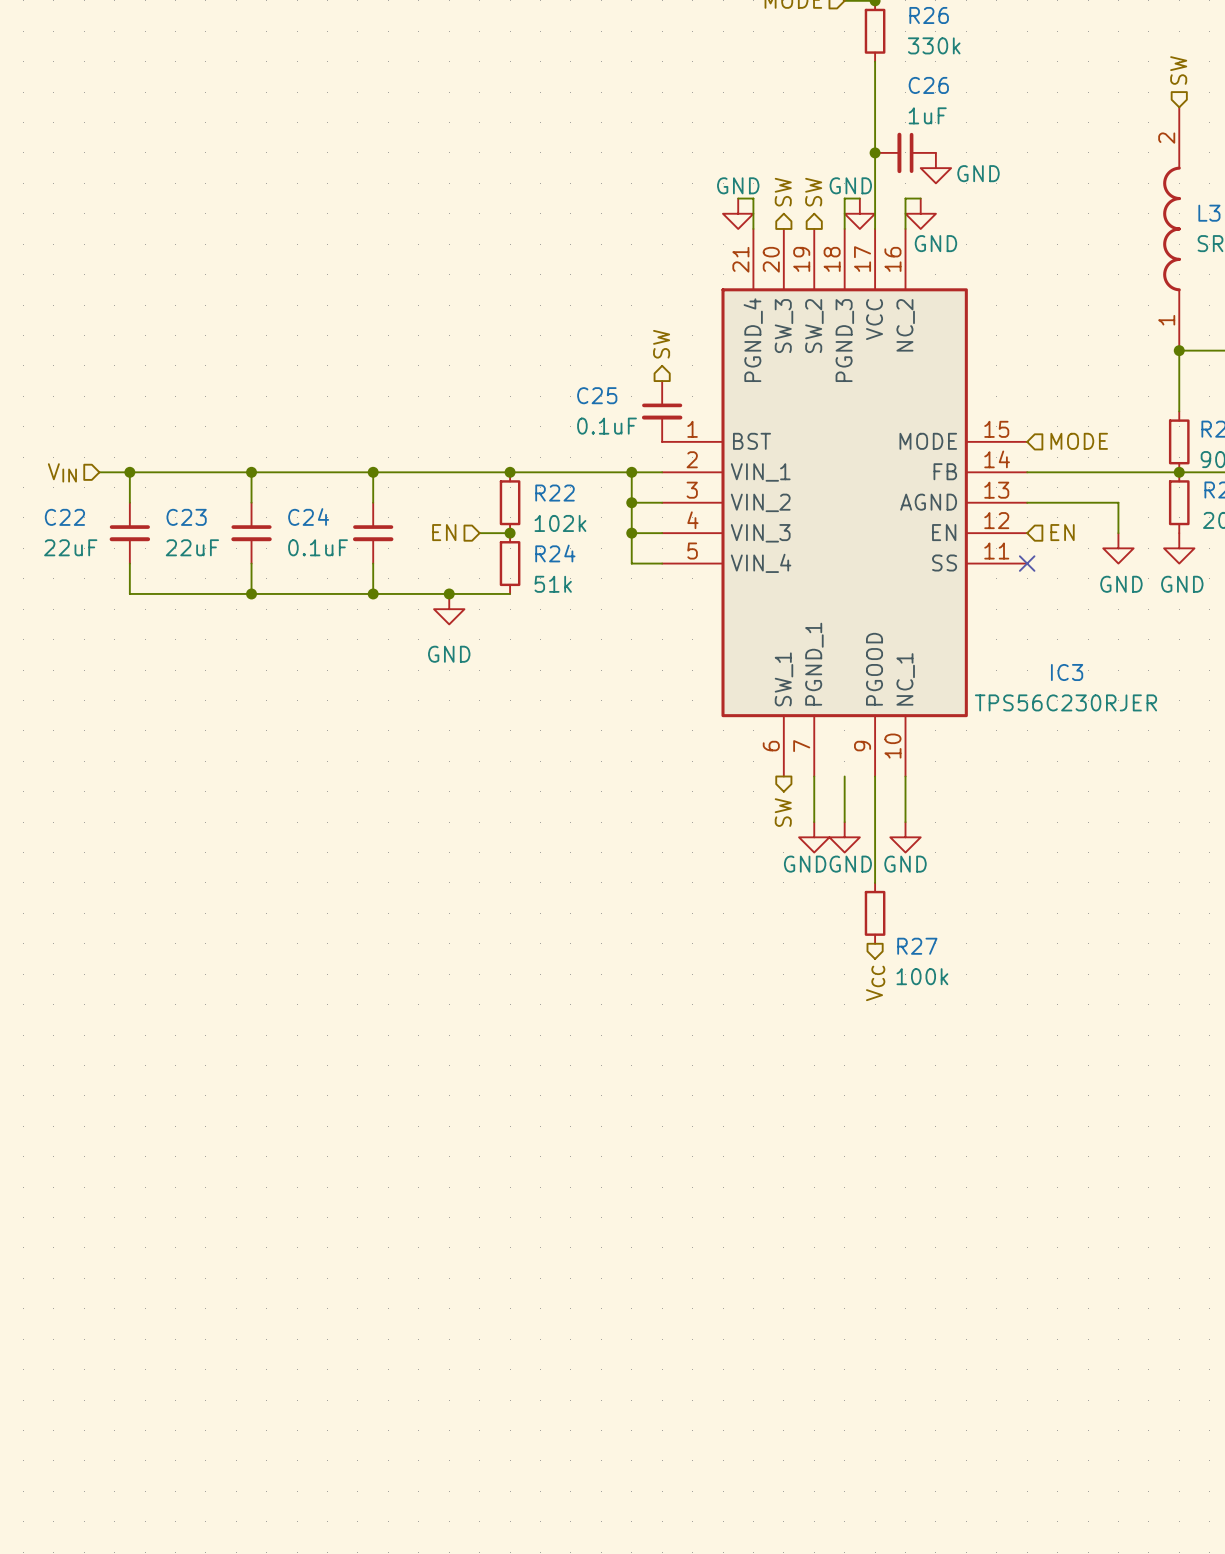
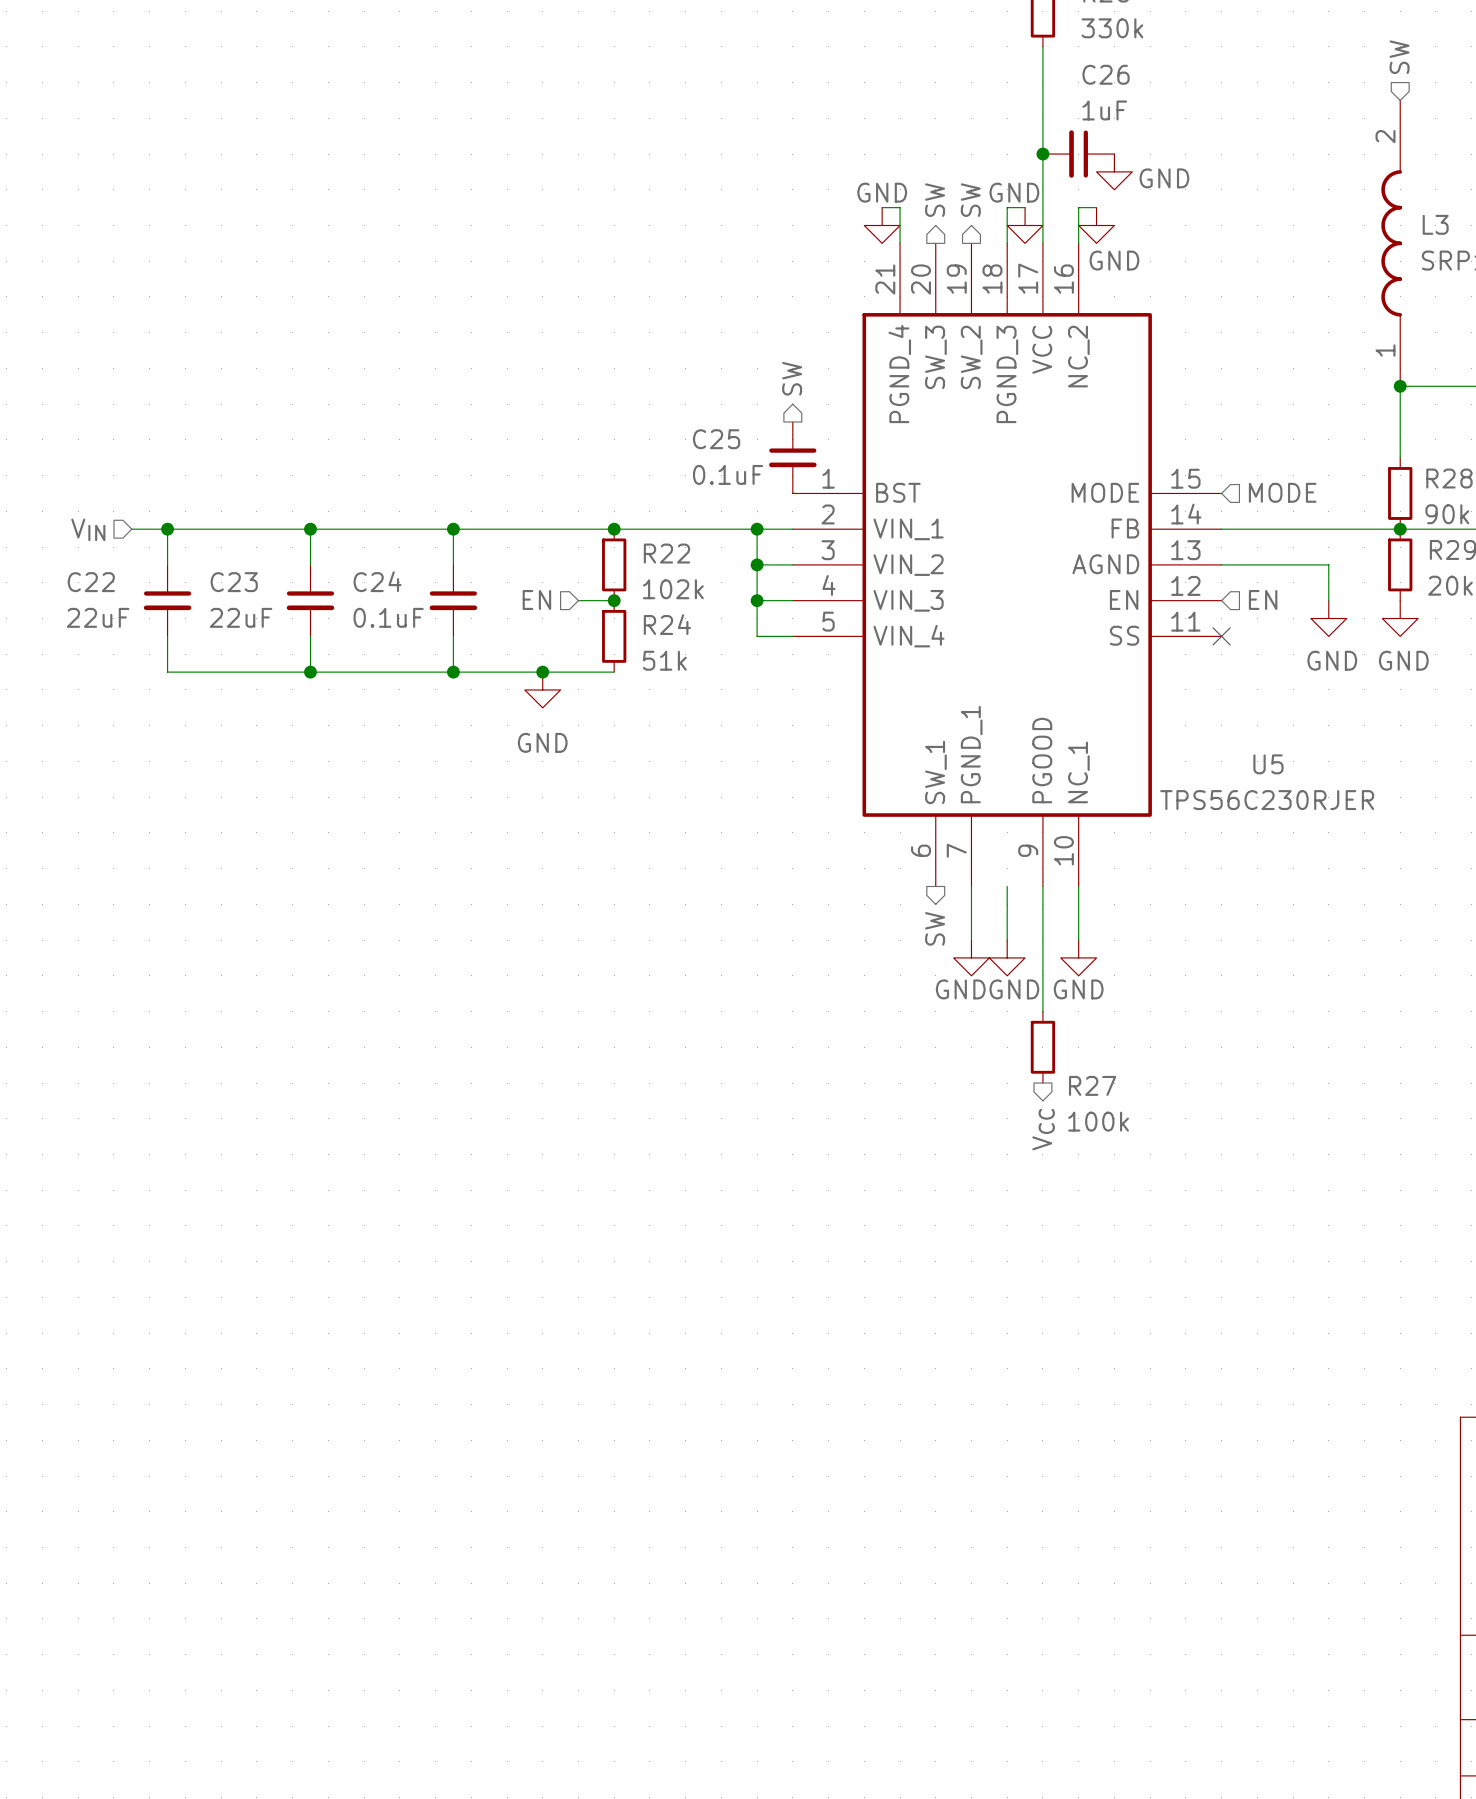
IC3 name: IC3 (1067, 672) -> U5 (1268, 764)

